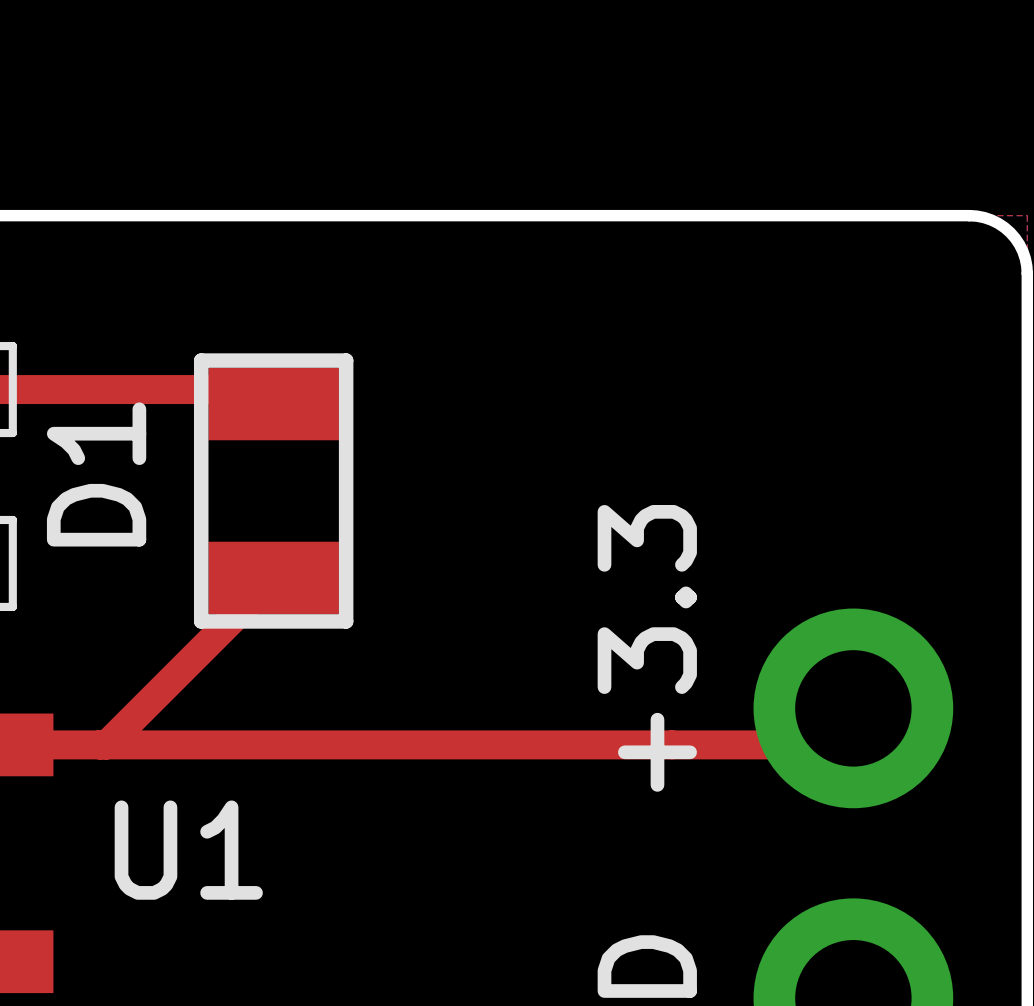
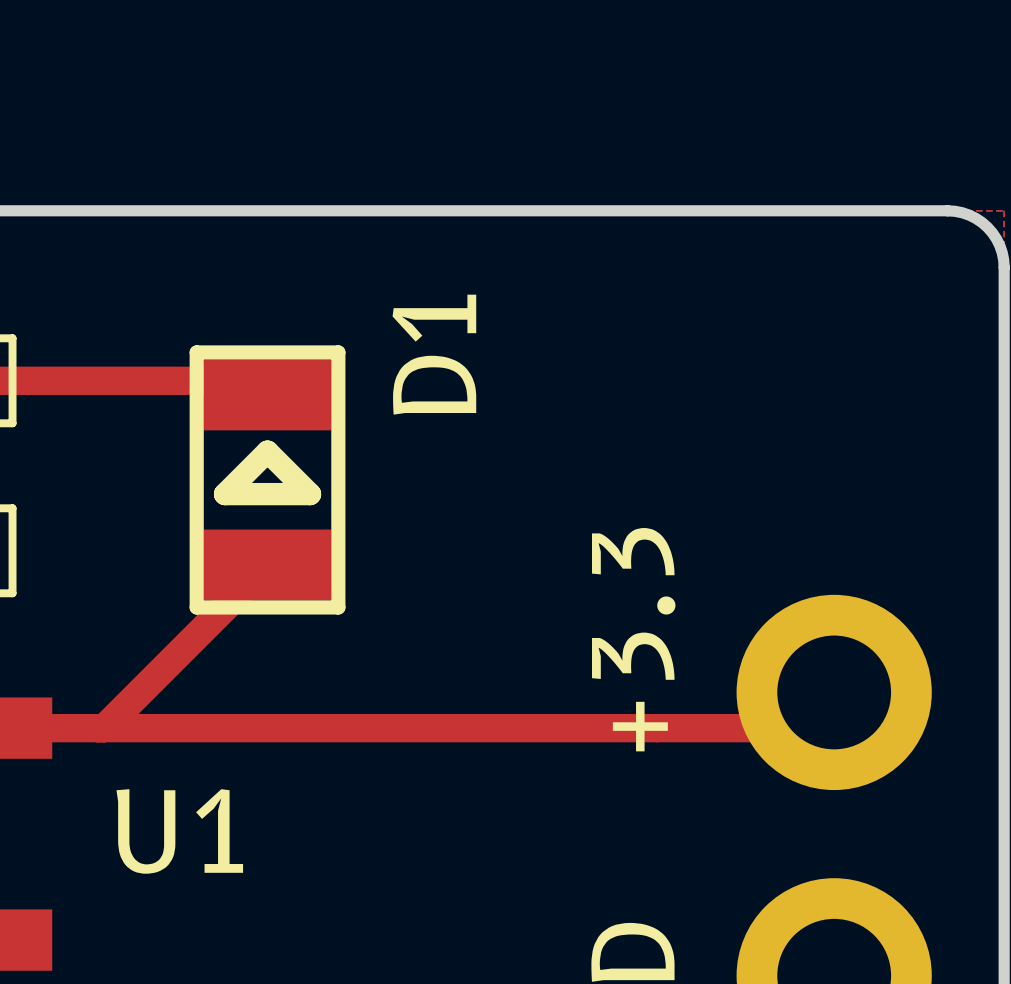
line: none -> (267, 451) (310, 494) (225, 494) (267, 451)
D1 name position: D1 (96, 474) -> D1 (434, 354)

